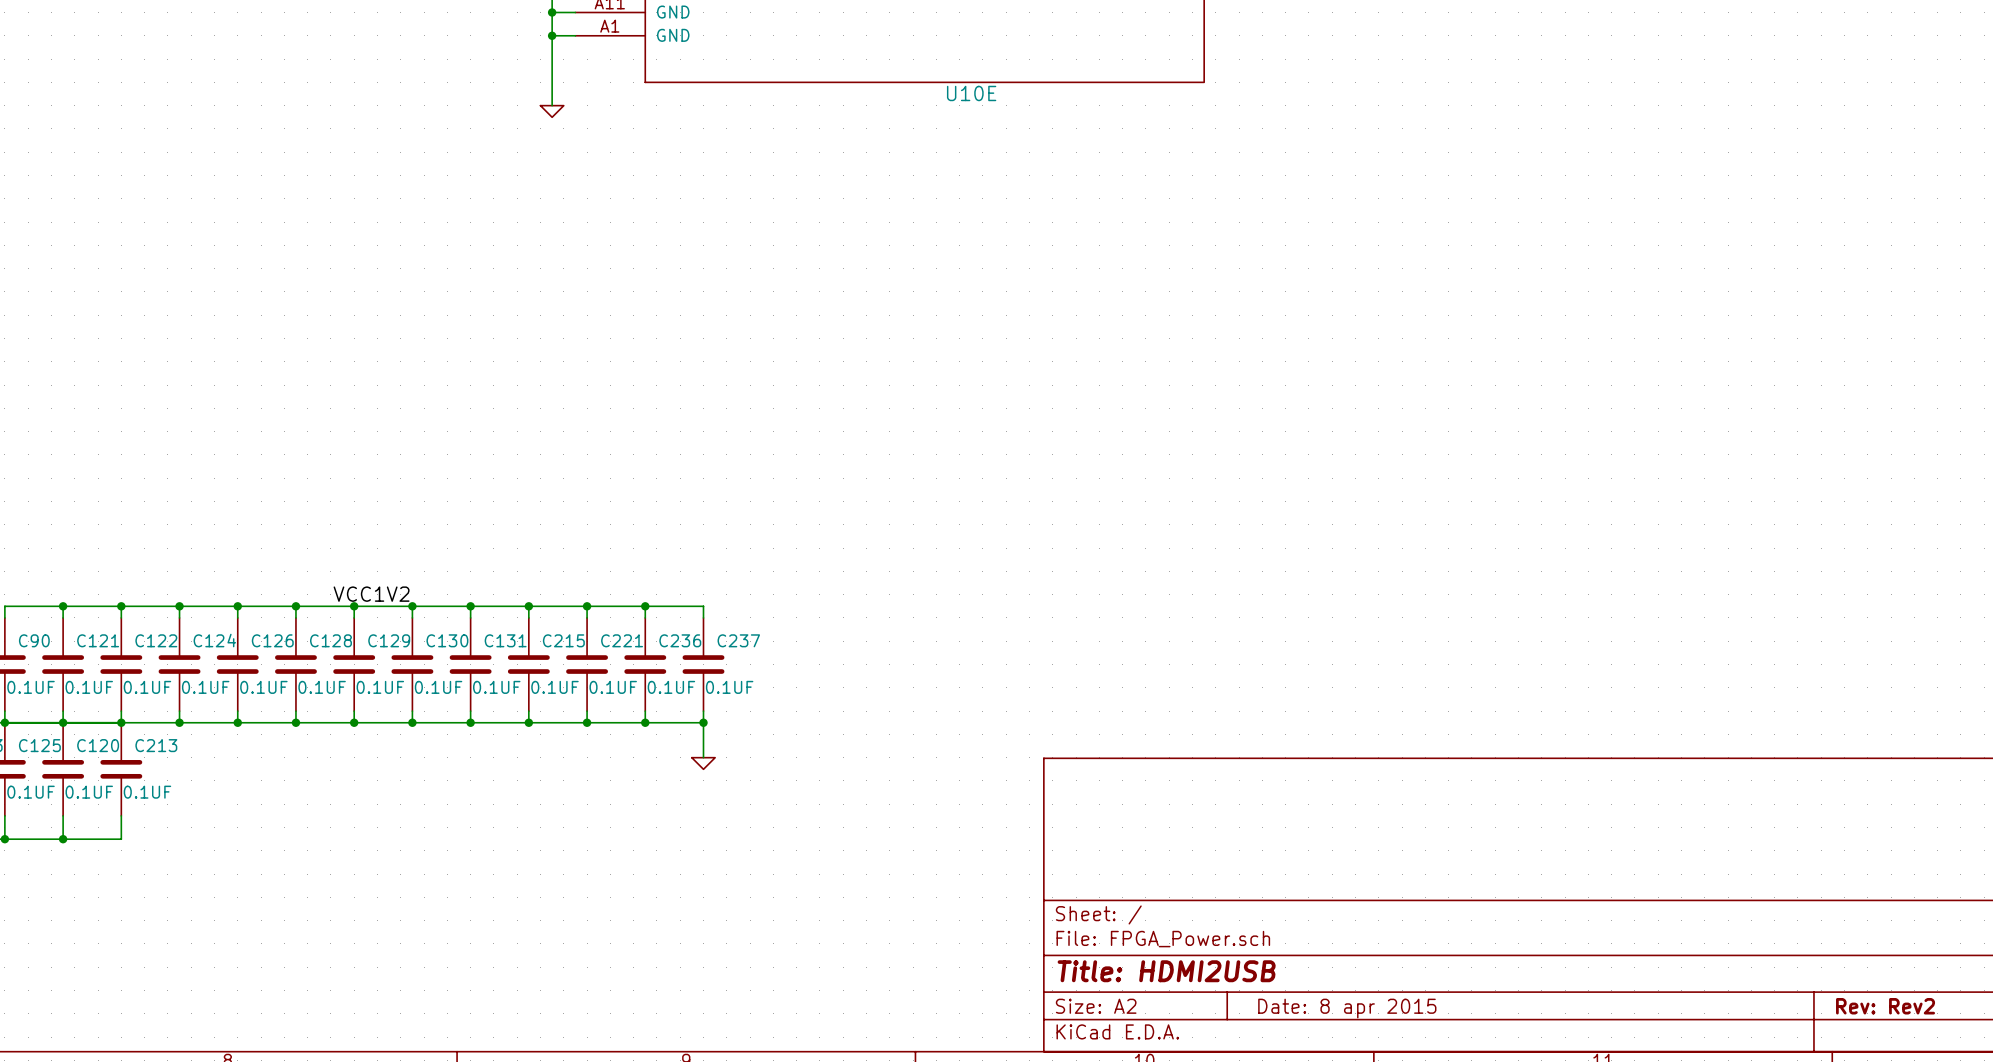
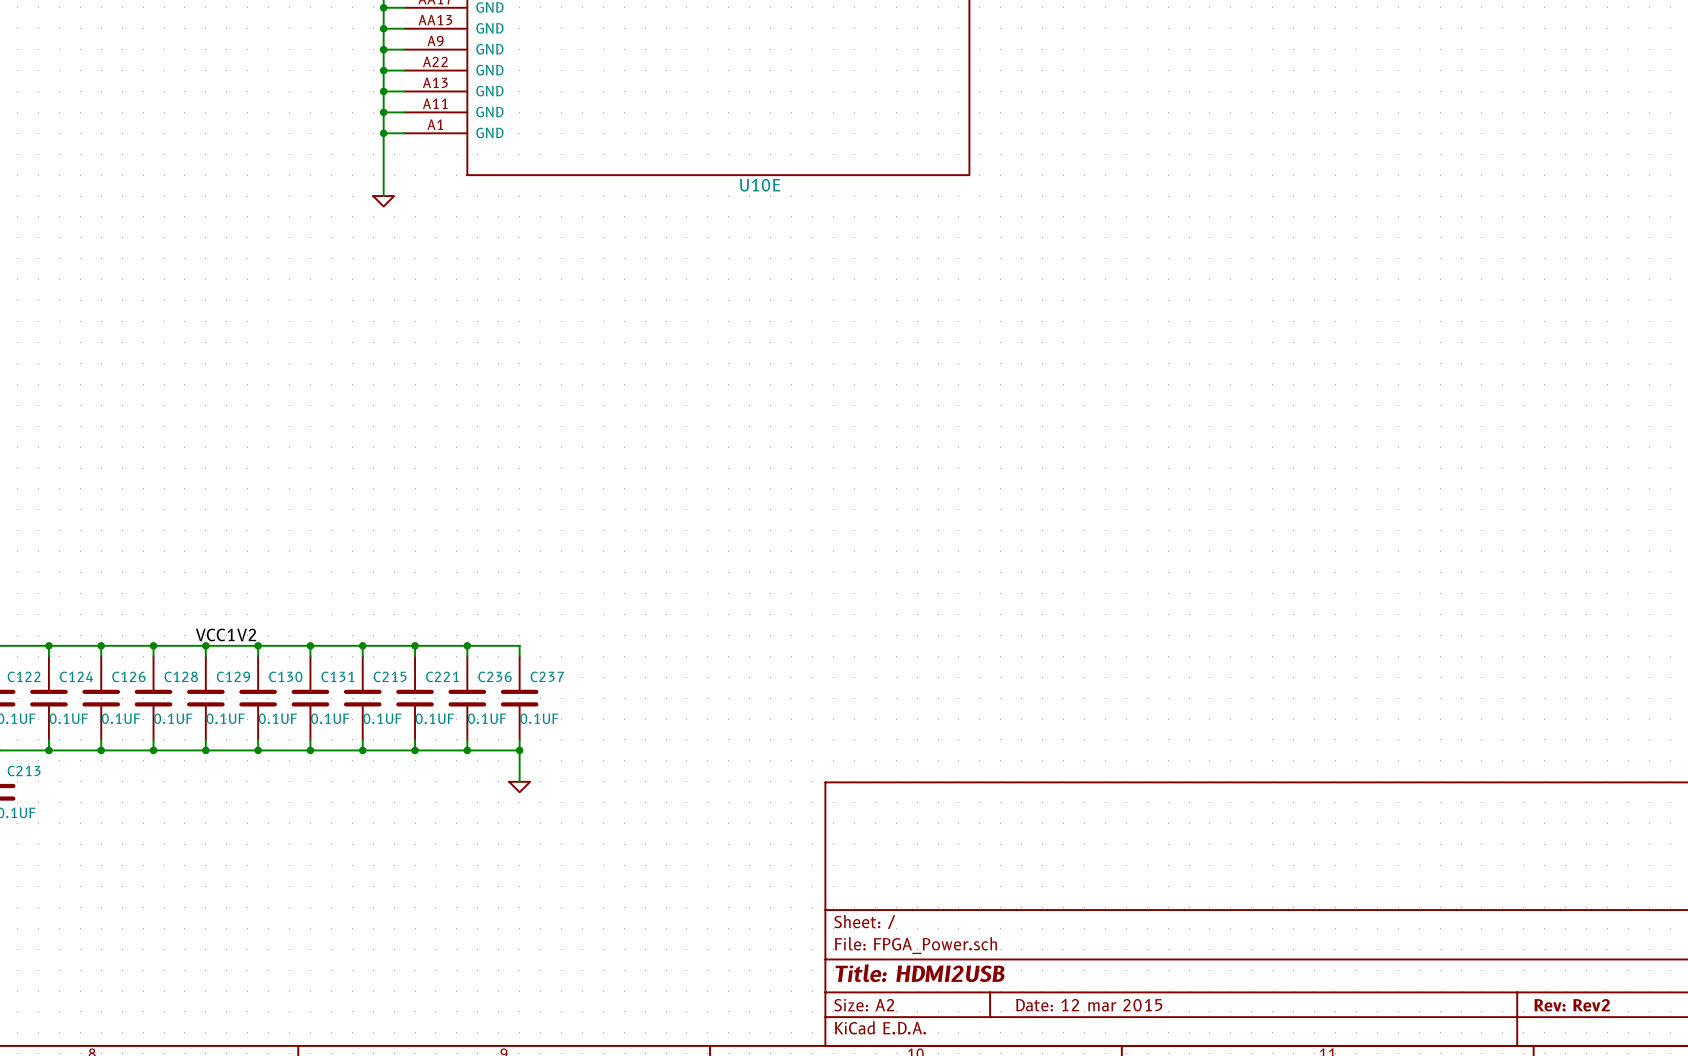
title block: Date: 8 apr 2015 (1347, 1008) -> Date: 12 mar 2015 (1089, 1005)

